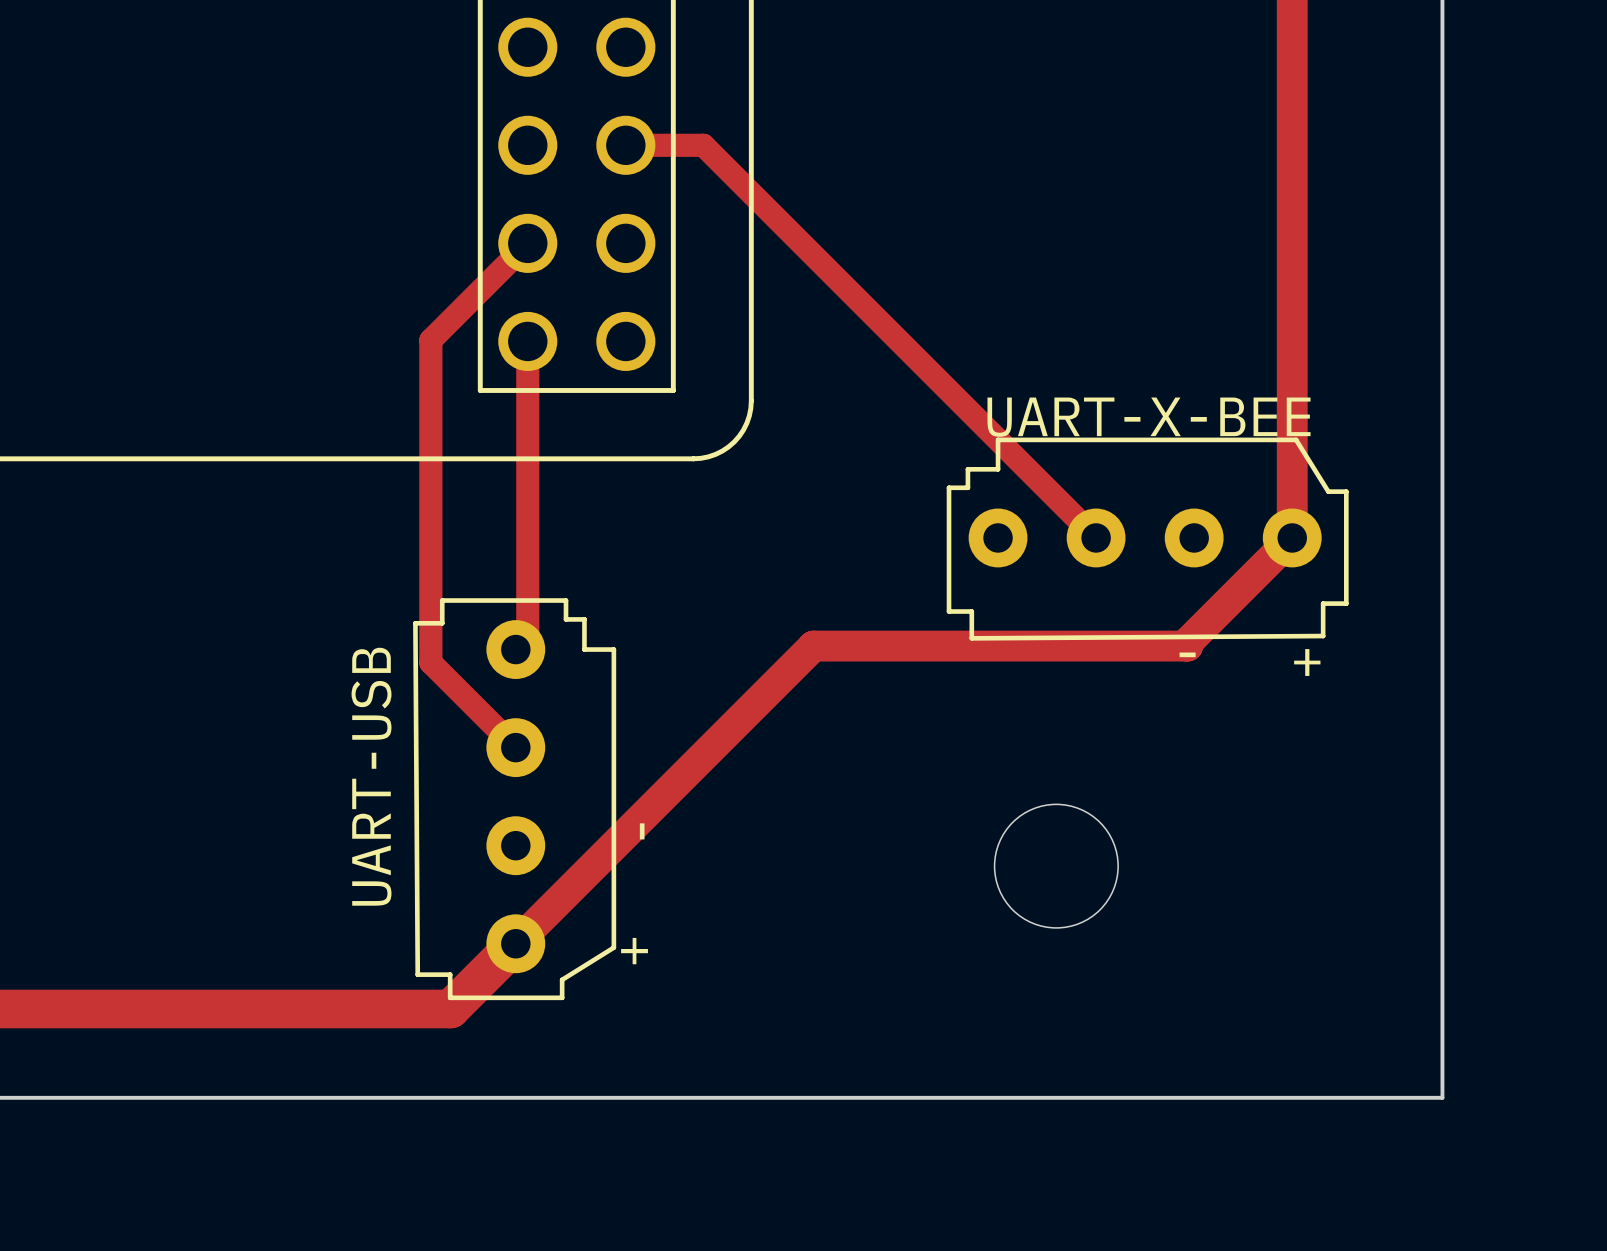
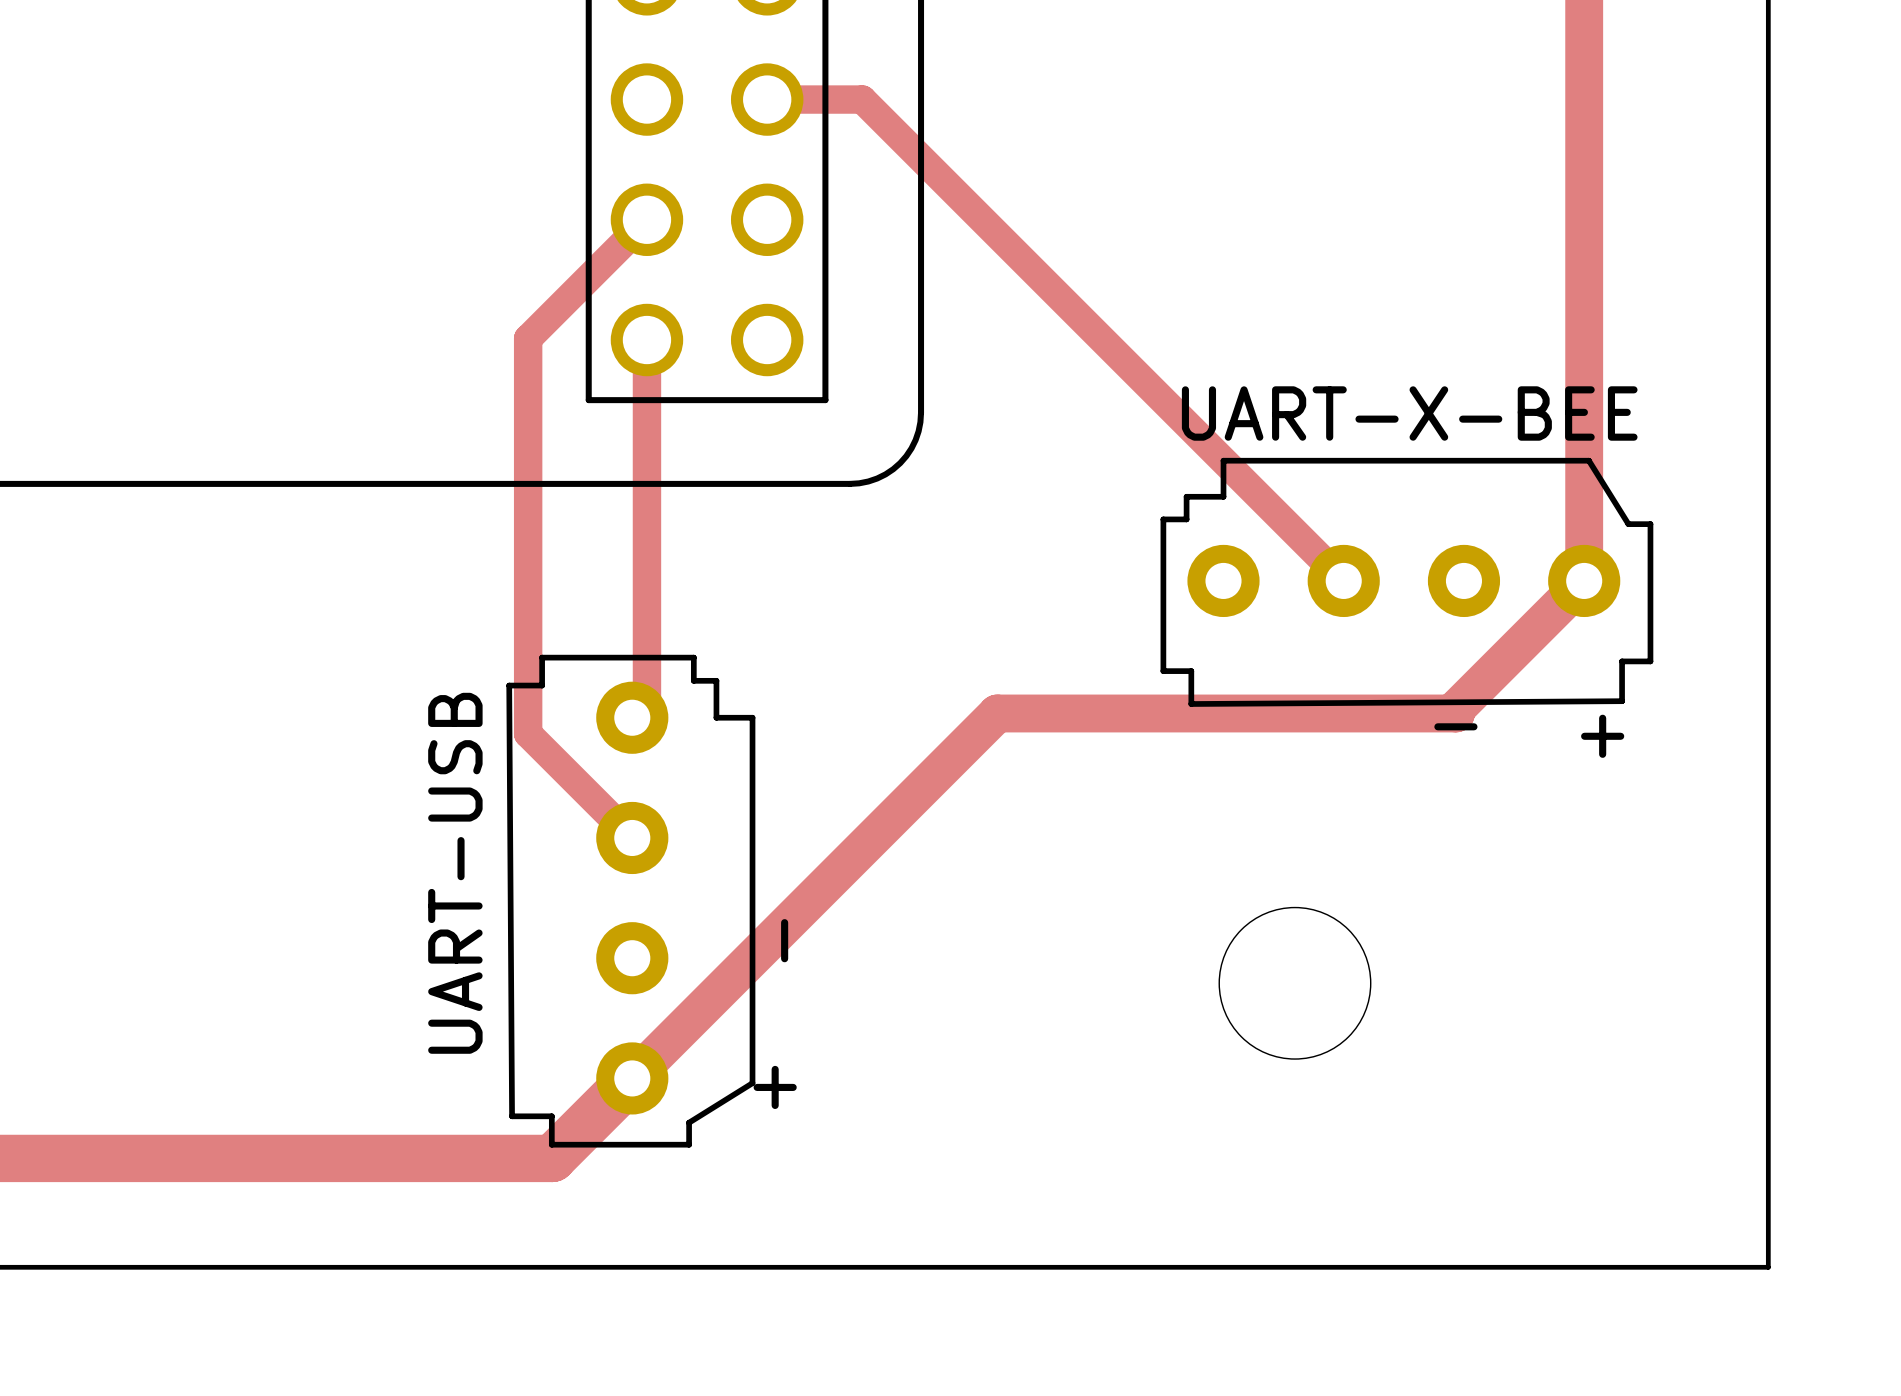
UART-X-BEE name position: UART-X-BEE (1149, 417) -> UART-X-BEE (1409, 413)

